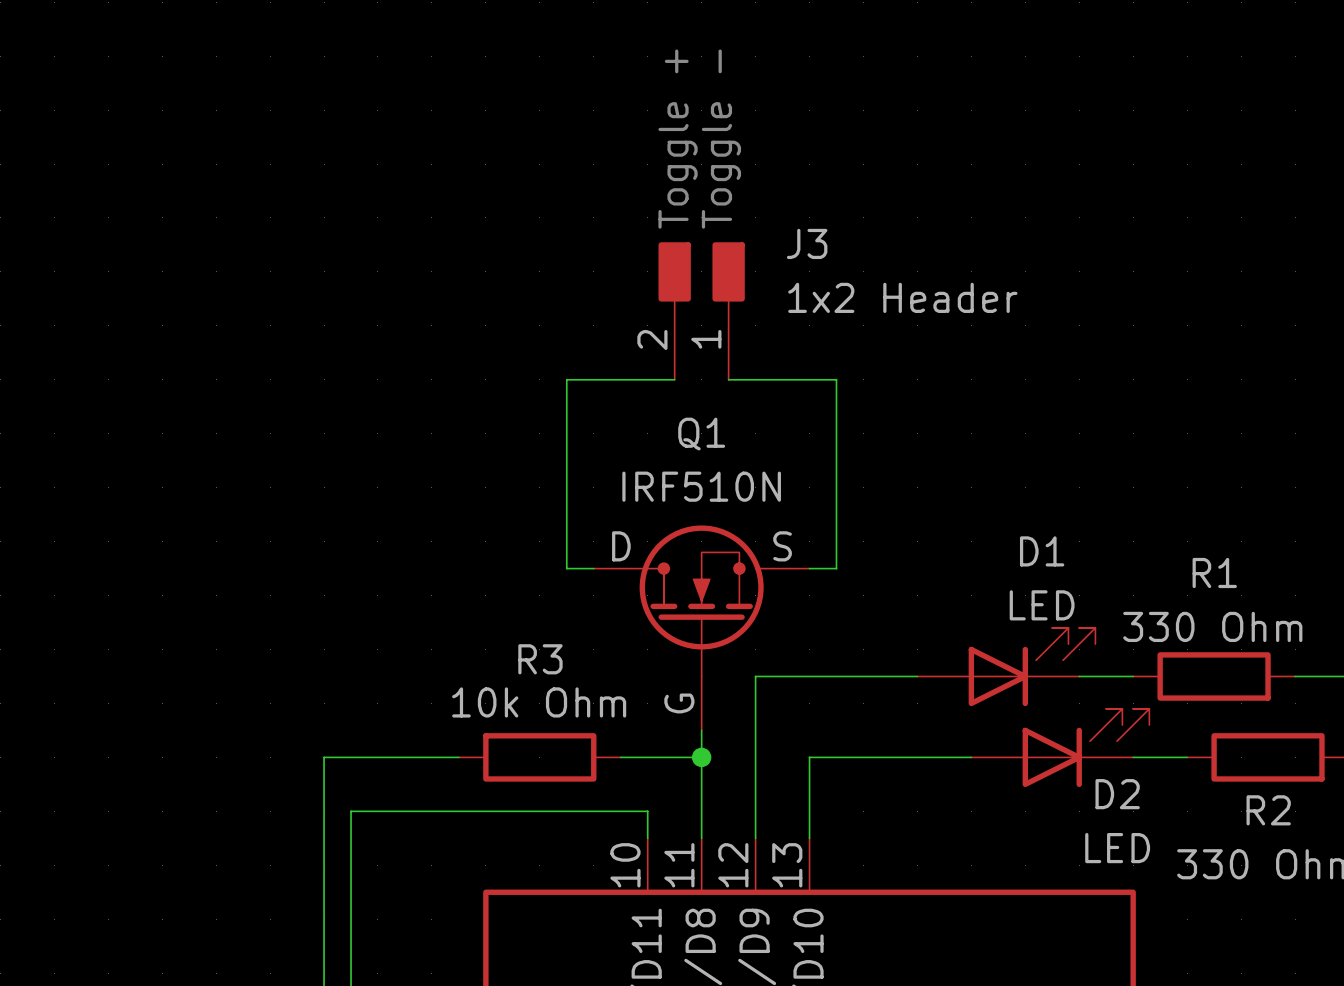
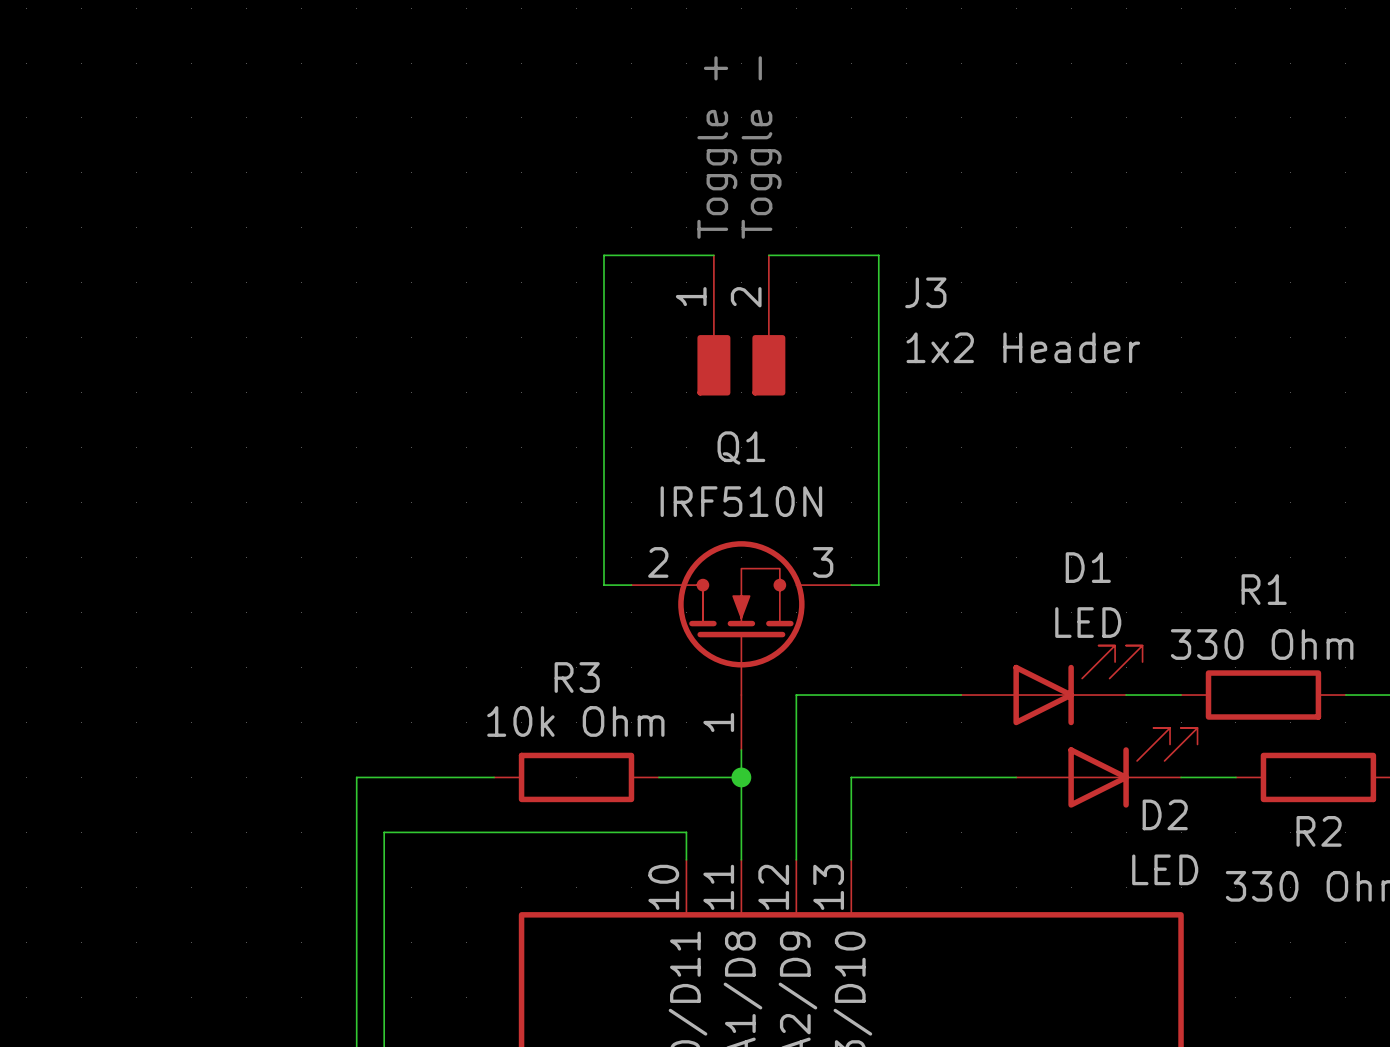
J3 name position: J3 (807, 243) -> J3 (925, 292)
J3 rotation: 0° (701, 271) -> 180° (741, 365)
J3 value position: 1x2 Header (902, 297) -> 1x2 Header (1023, 347)
wire: (566, 379) (674, 379) -> (604, 392) (604, 255) (713, 255)
wire: (728, 379) (836, 379) -> (768, 255) (878, 255) (878, 392)
Q1 pin number: D (621, 546) -> 2 (658, 562)
Q1 pin number: S (782, 546) -> 3 (823, 562)
Q1 pin number: G (679, 703) -> 1 (718, 722)

